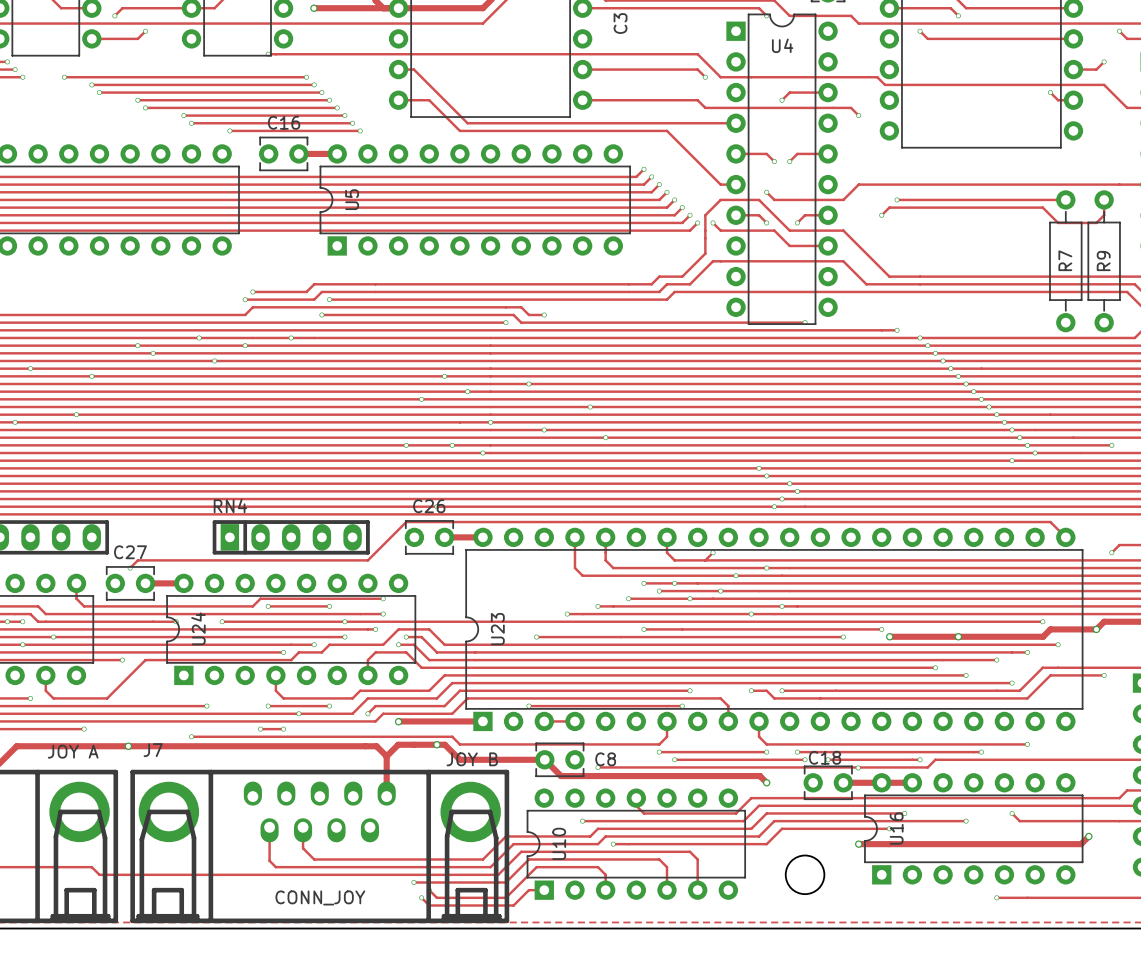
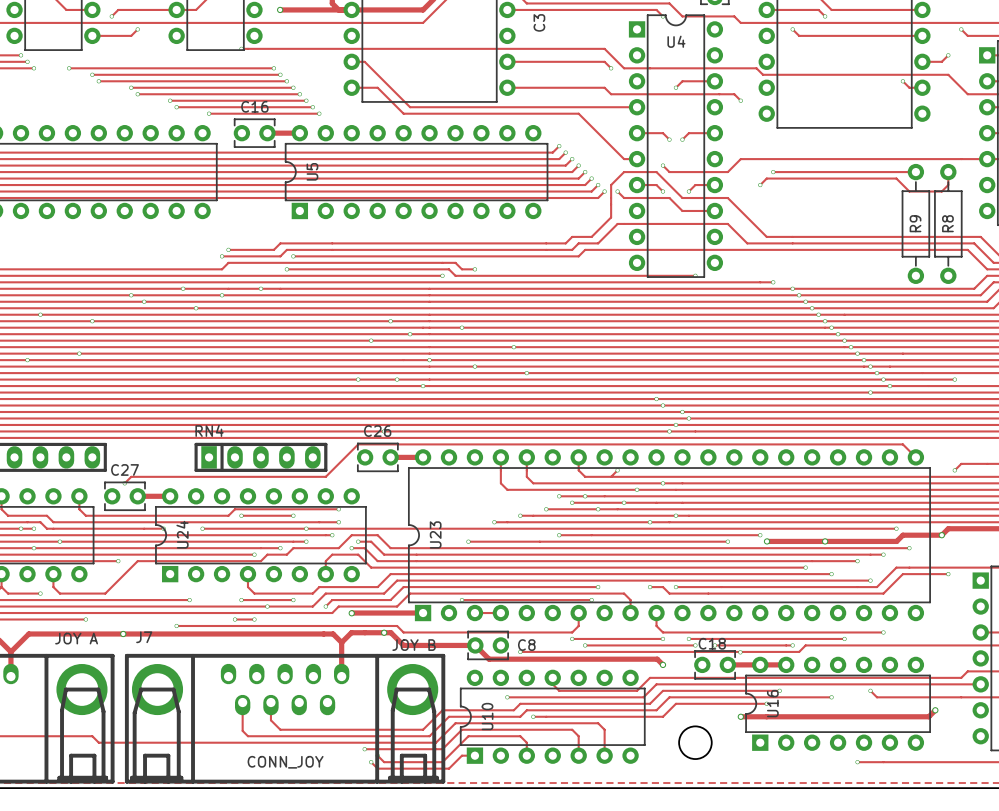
R7 name: R7 (1065, 260) -> R9 (915, 223)
R9 name: R9 (1103, 261) -> R8 (947, 223)

